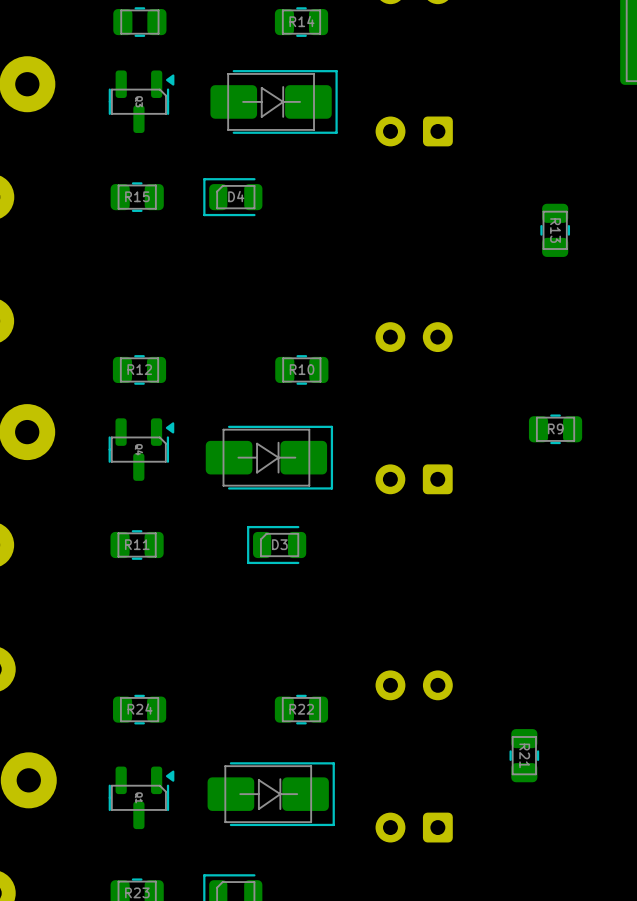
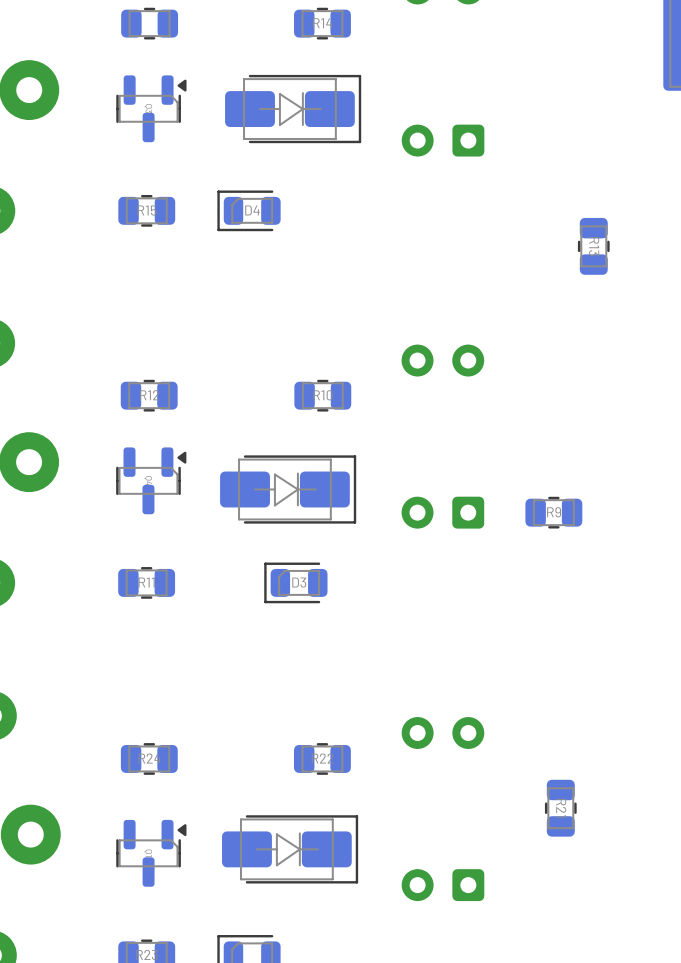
R9 position: (555, 429) -> (553, 512)

